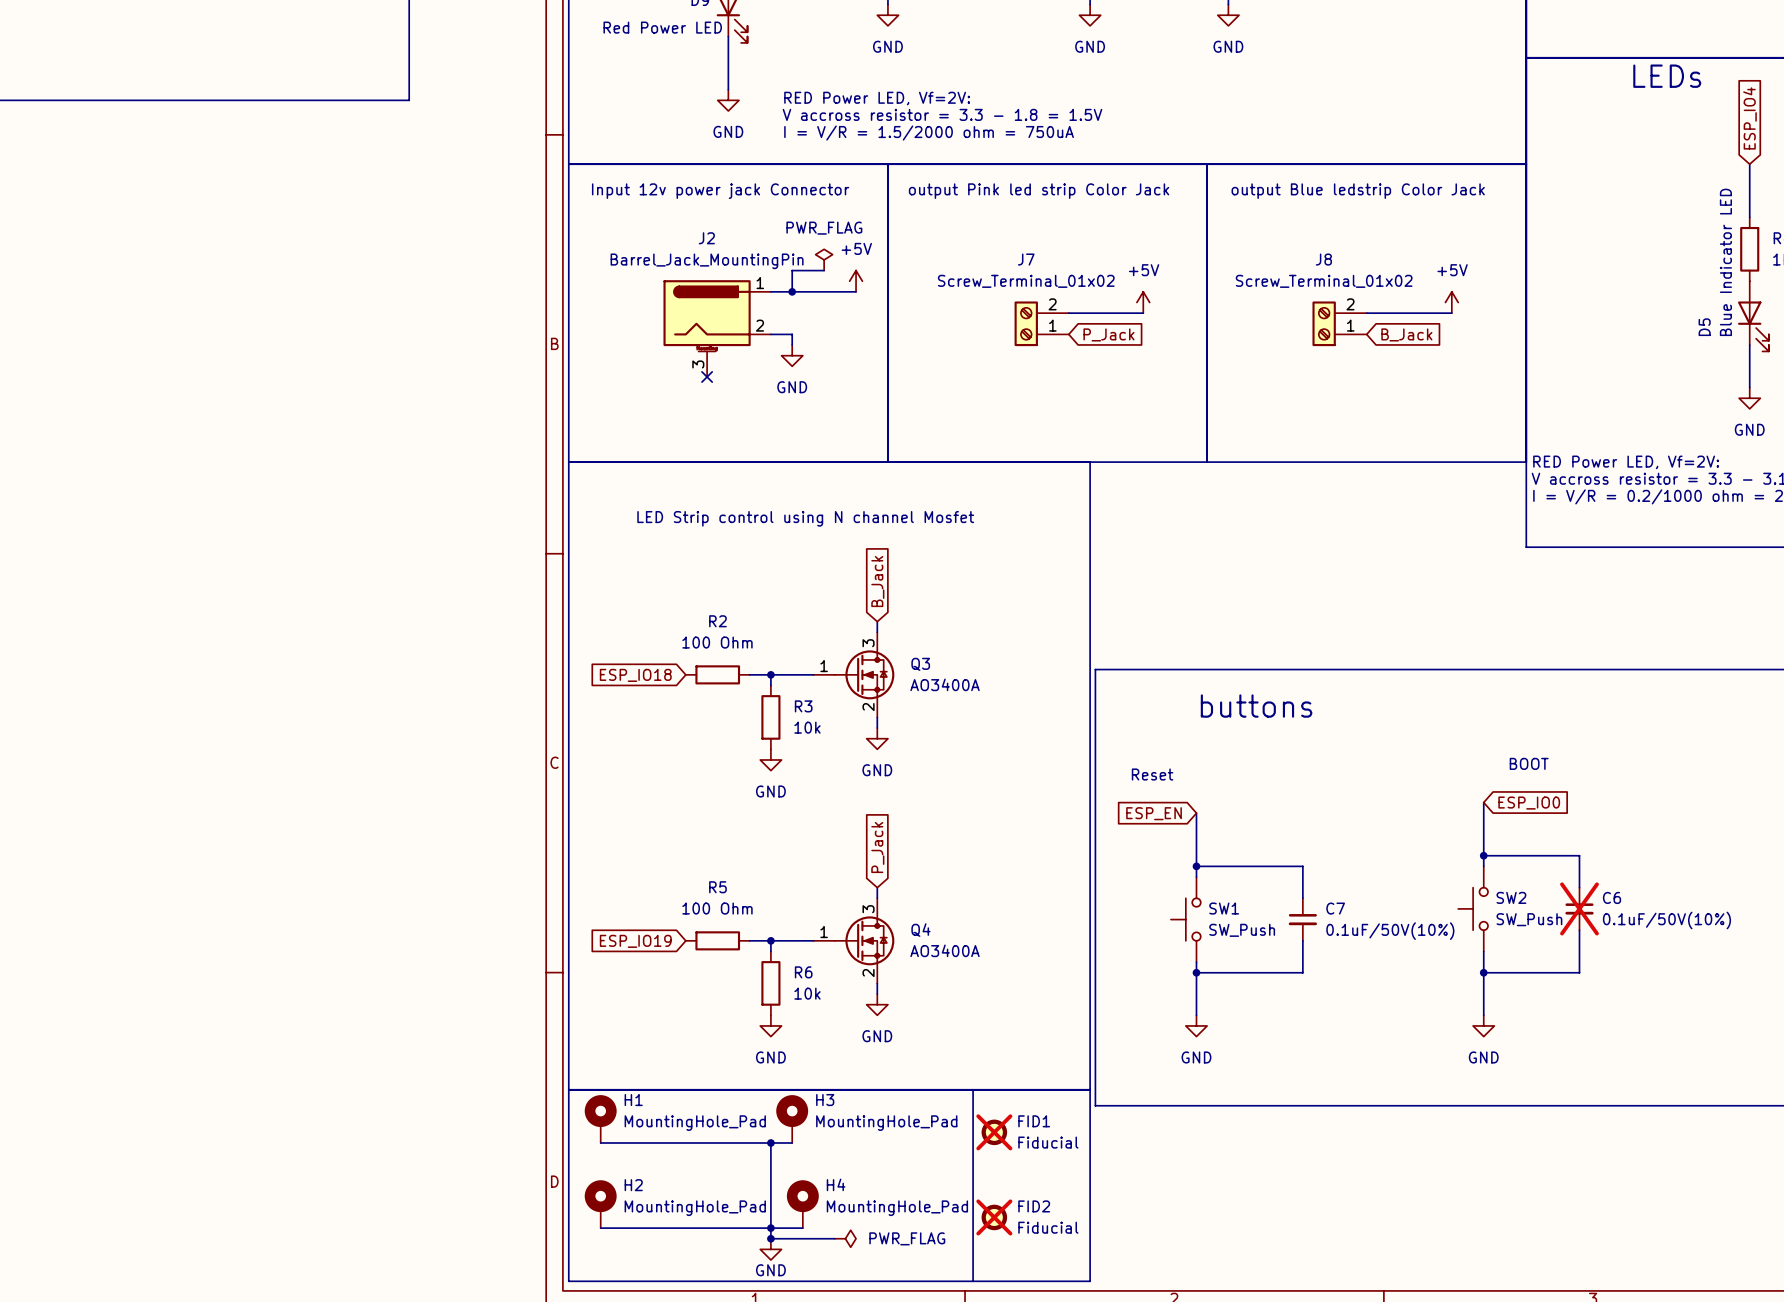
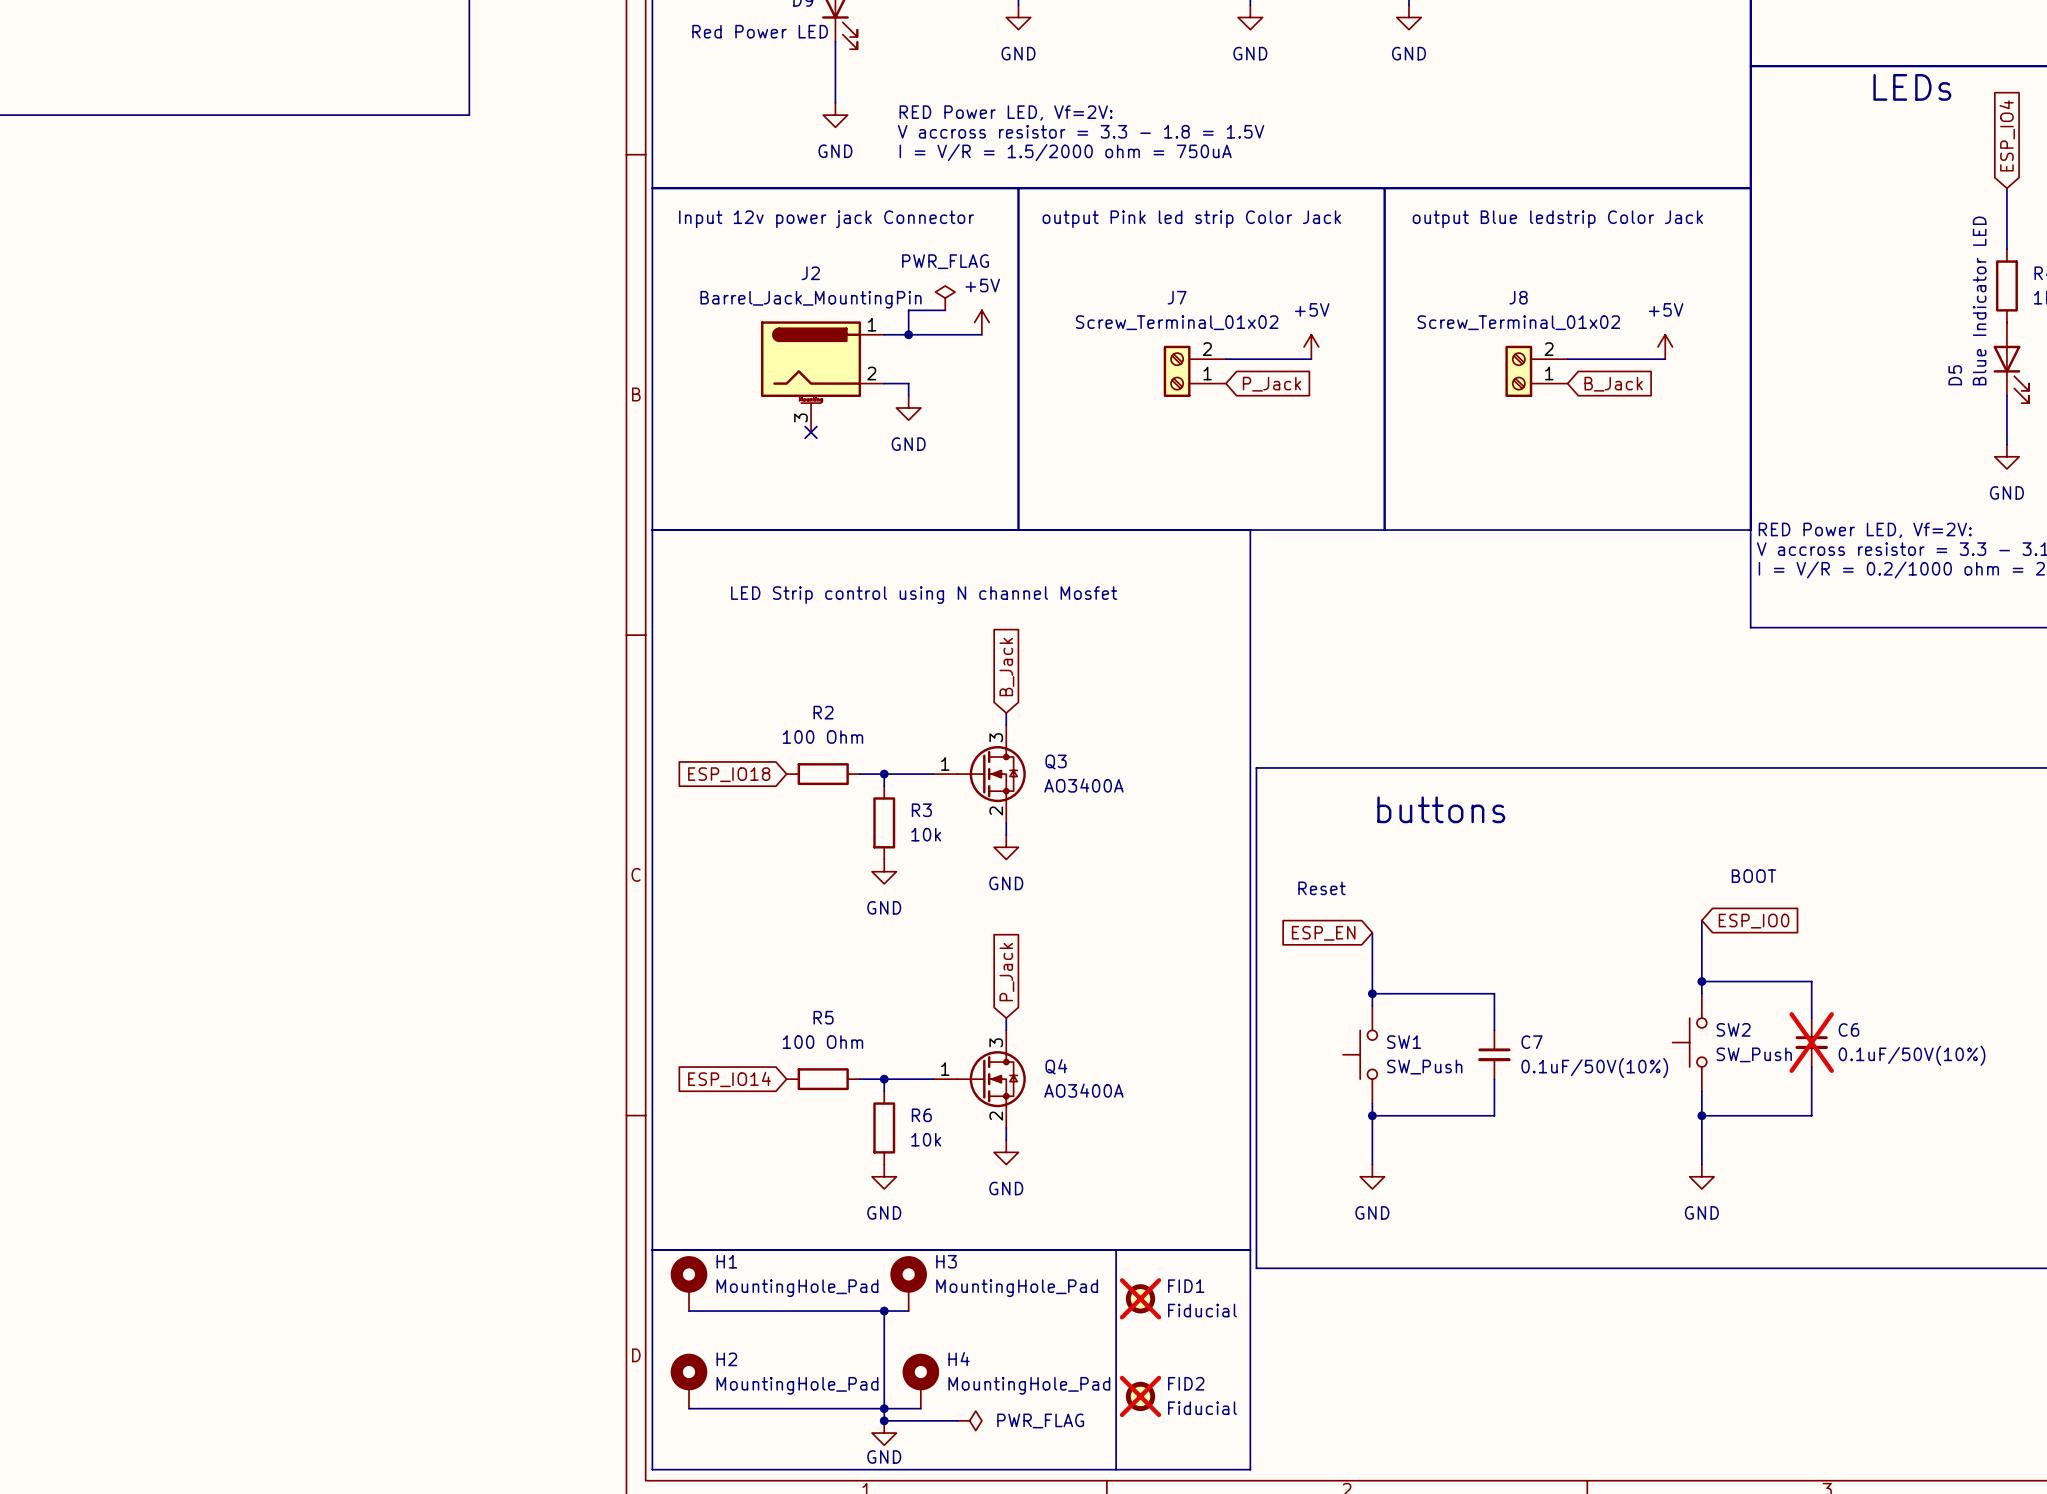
global label: ESP_IO19 (635, 941) -> ESP_IO14 (729, 1079)

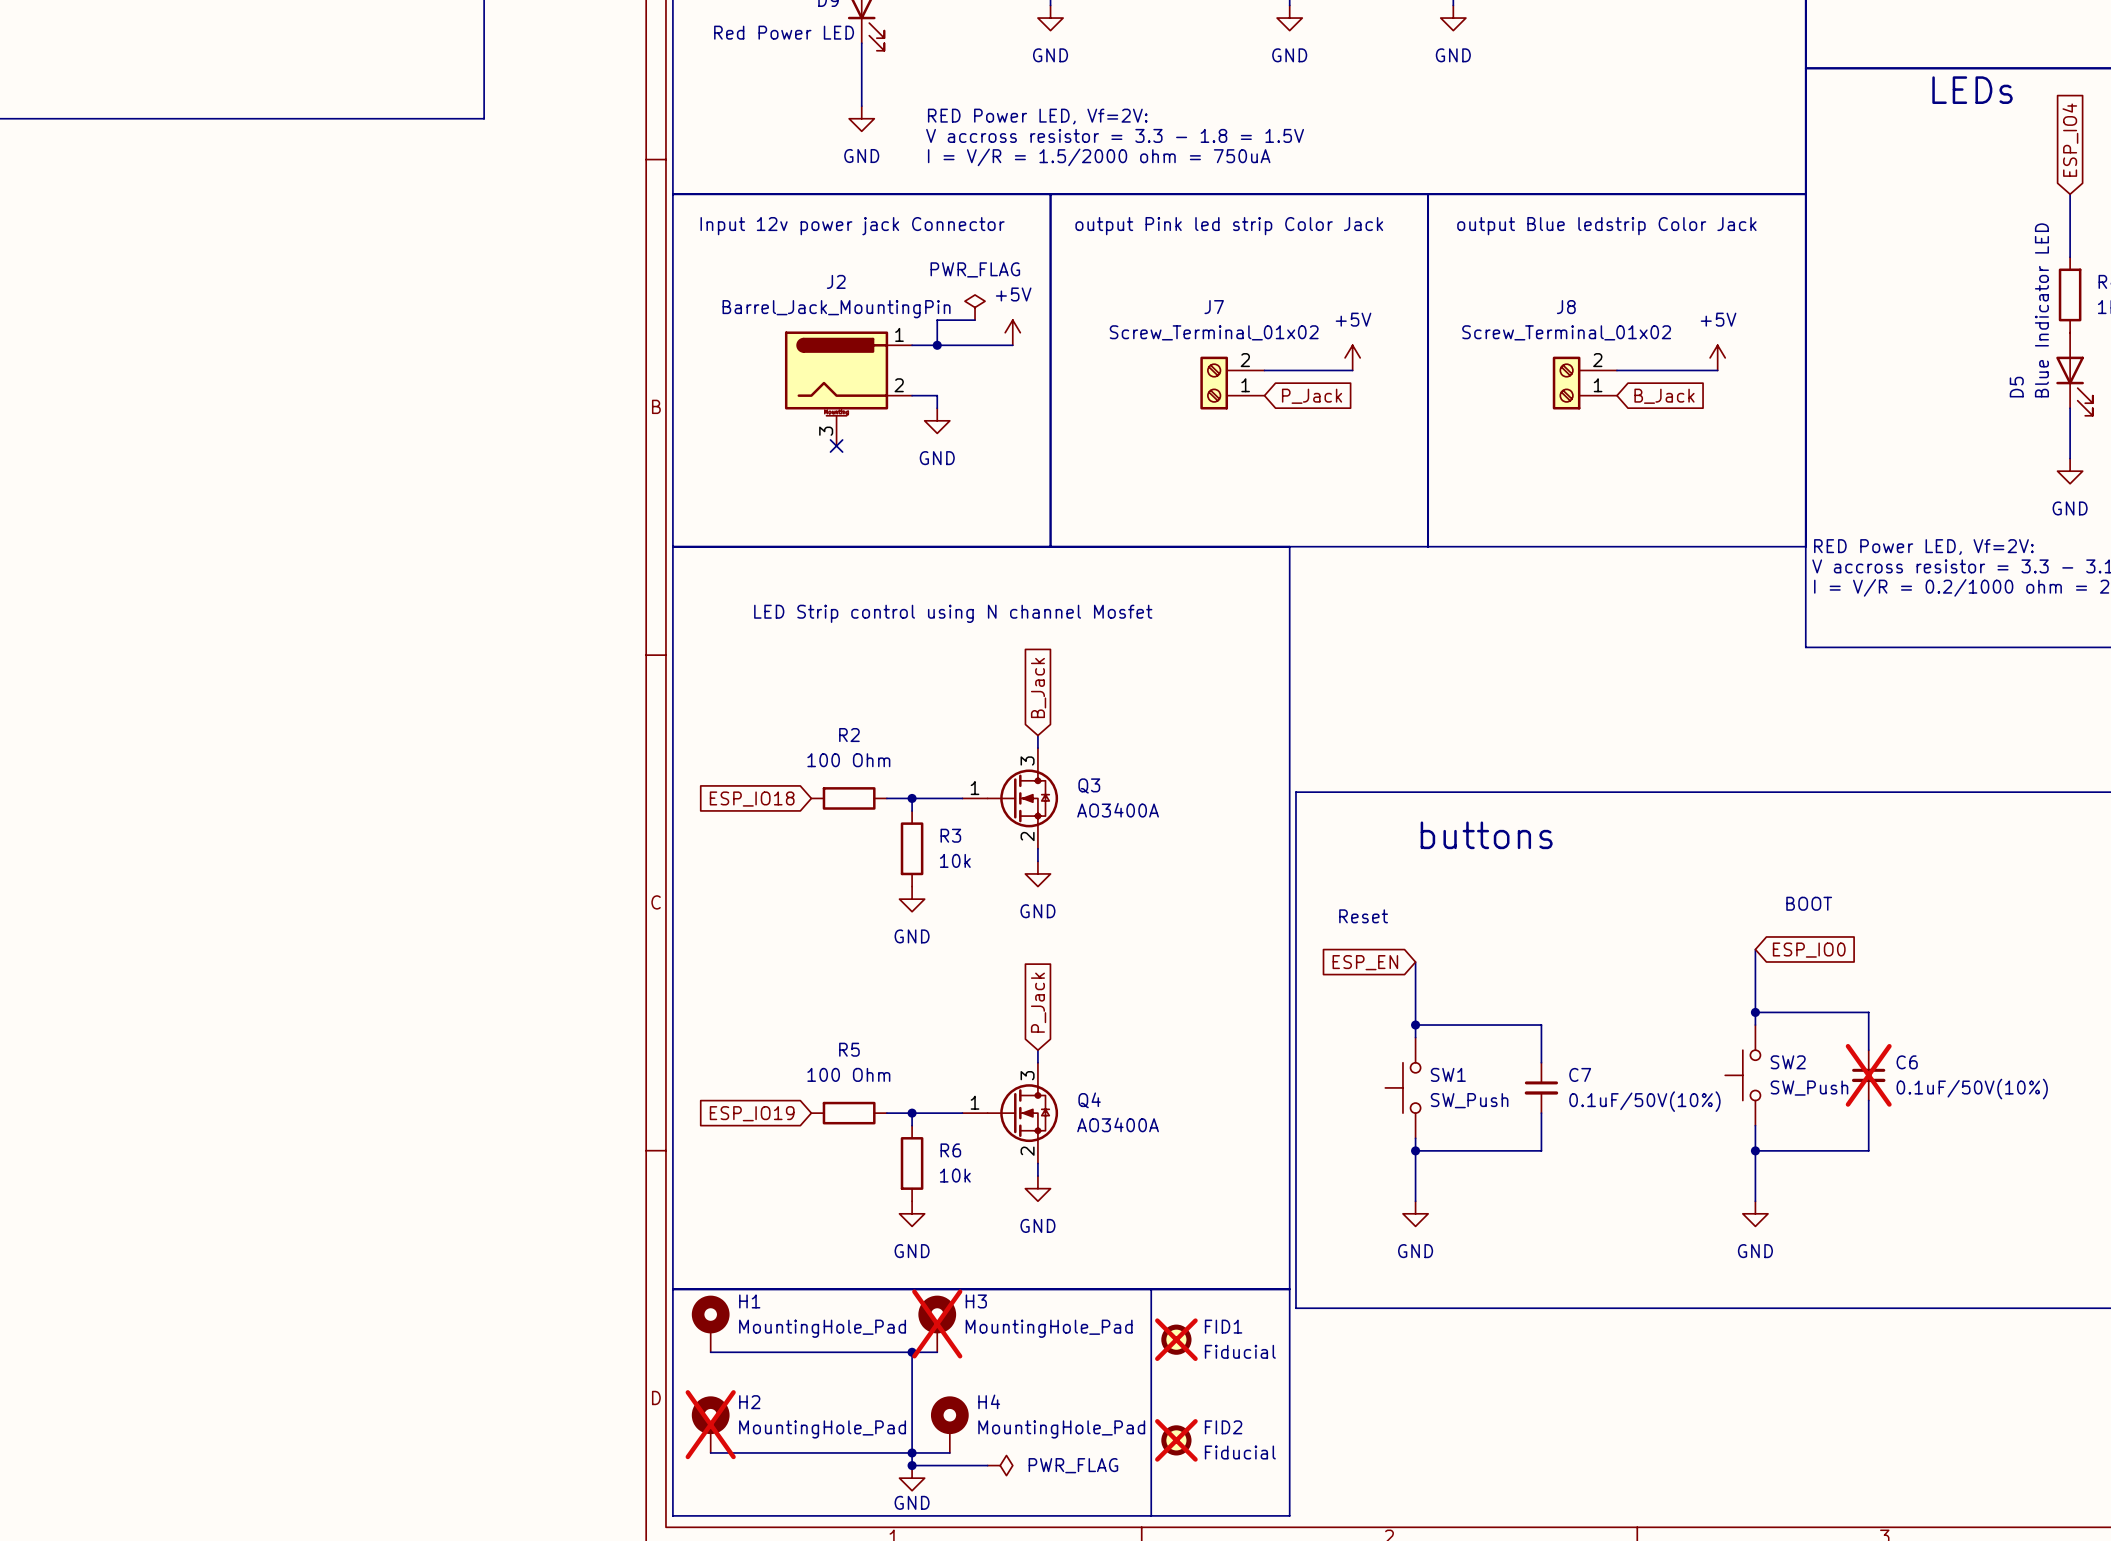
global label: ESP_IO14 (729, 1079) -> ESP_IO19 (752, 1113)
H3 do-not-place cross: none -> (937, 1323)
H2 do-not-place cross: none -> (710, 1424)

